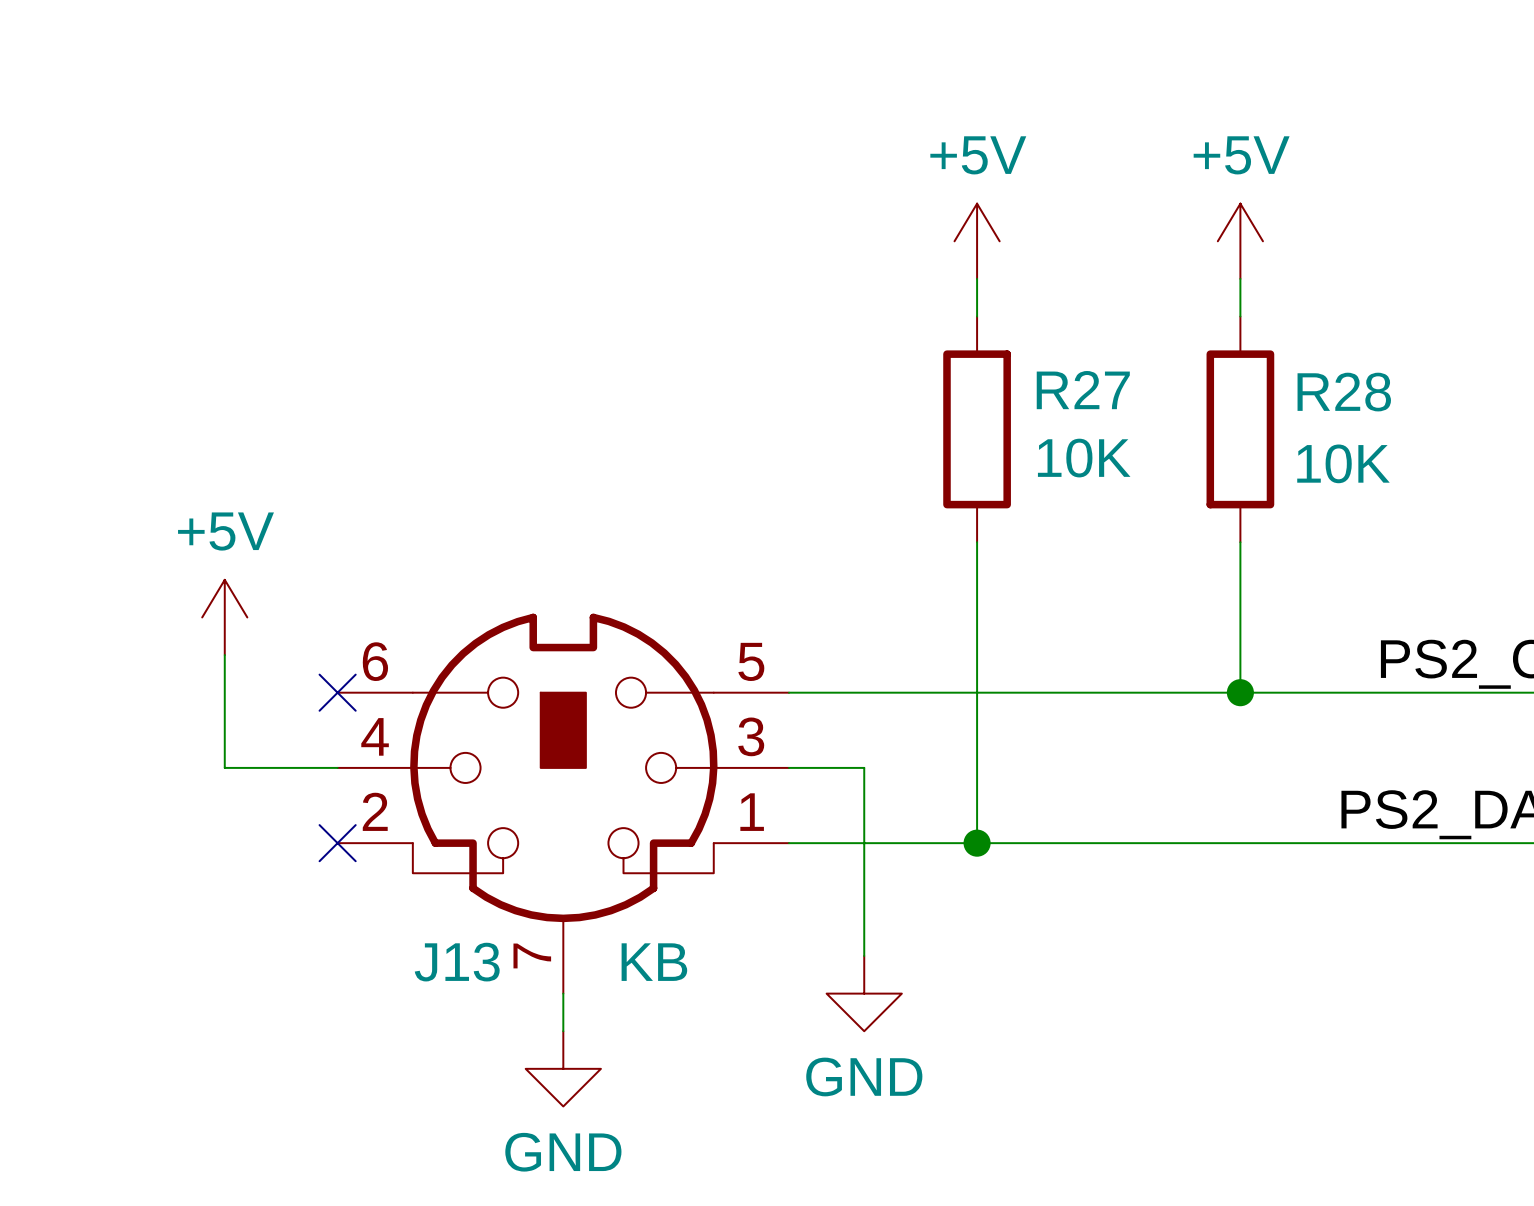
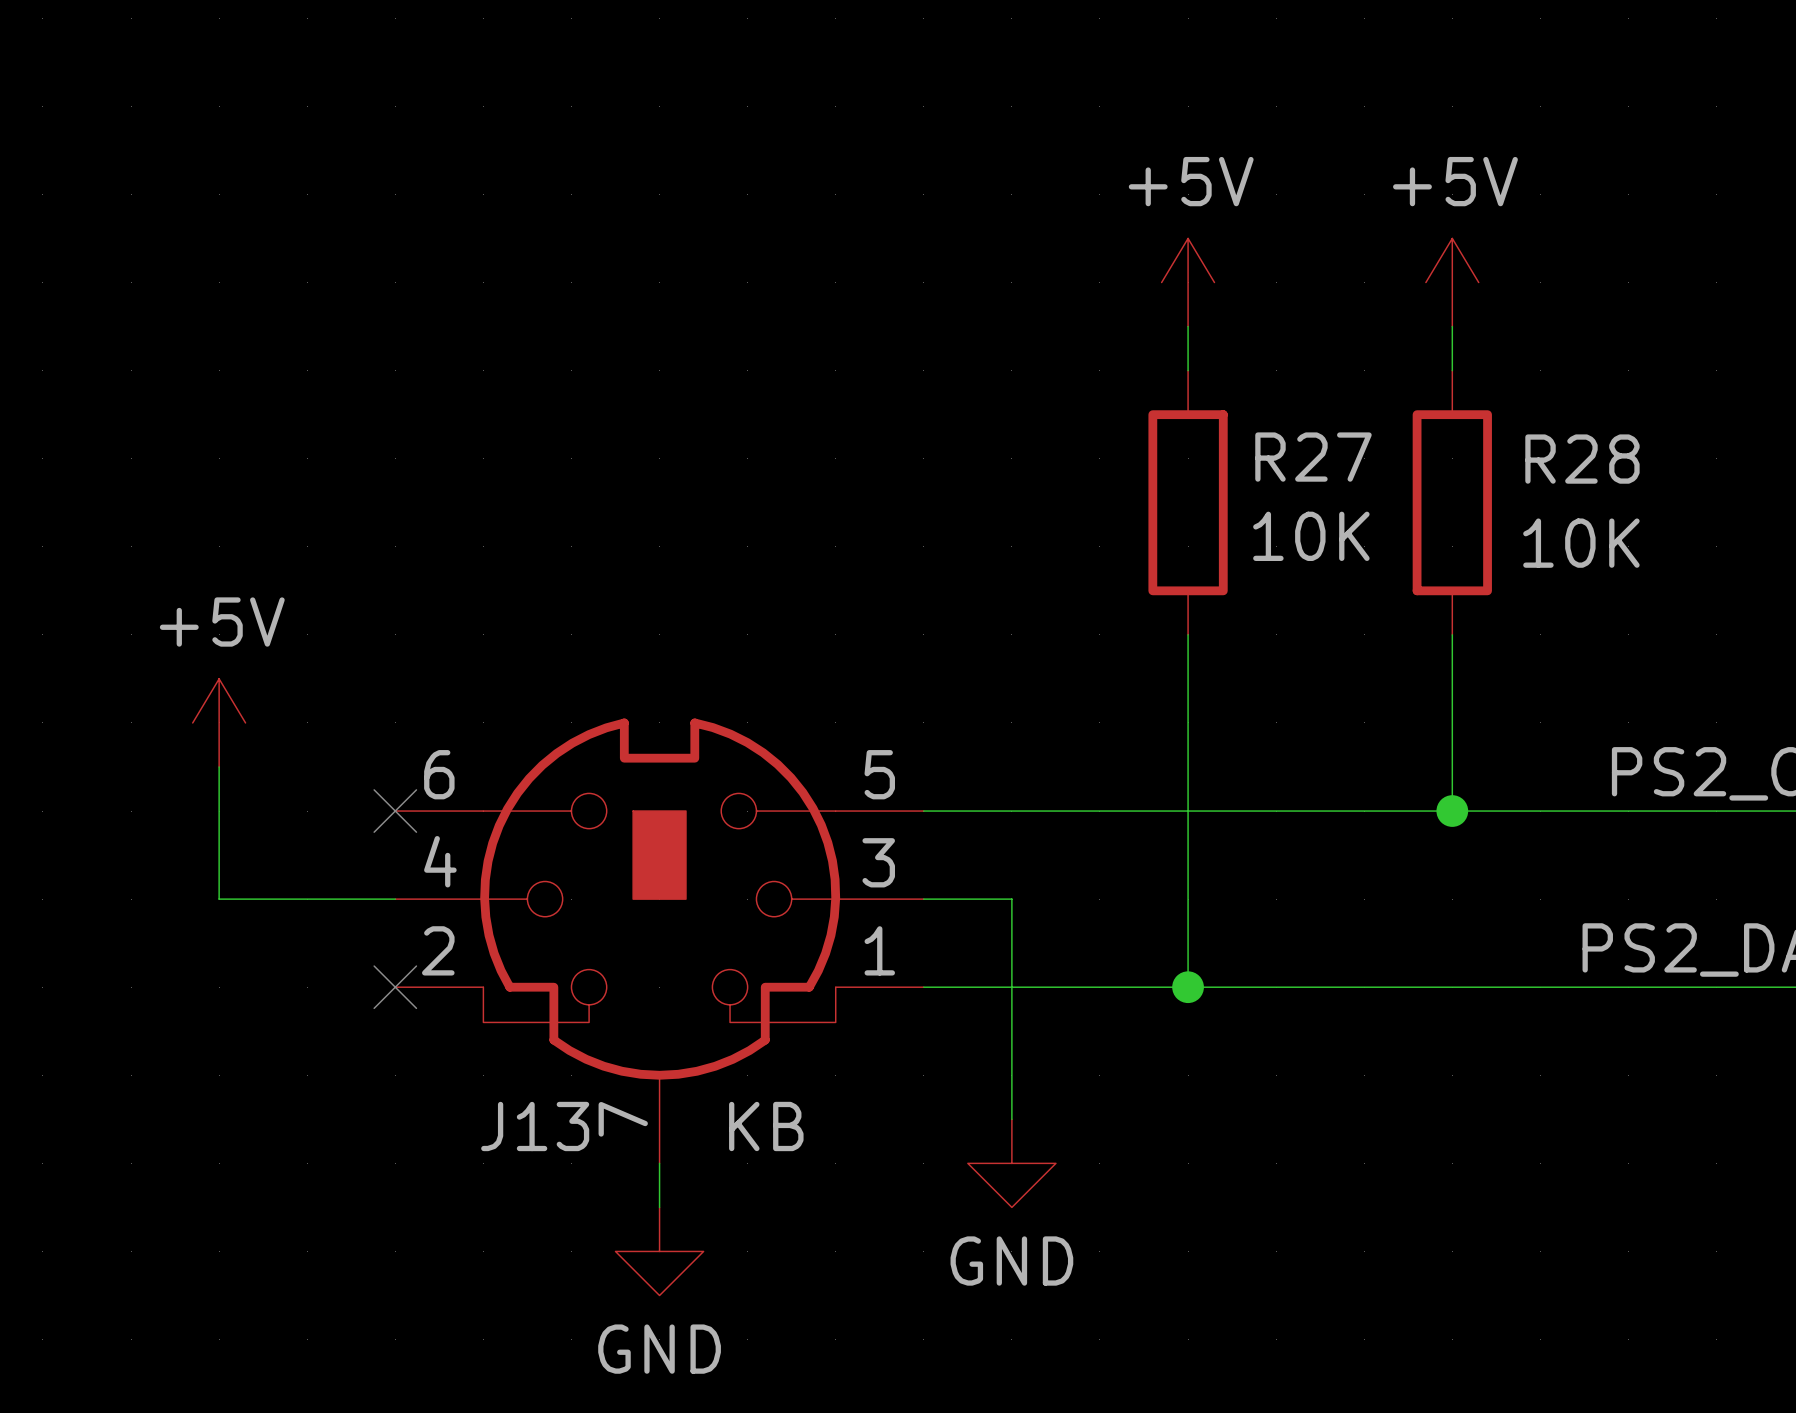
power symbol position: +5V (977, 241) -> +5V (1188, 282)
wire: (977, 278) (977, 316) -> (1188, 326) (1188, 370)
R27 position: (977, 429) -> (1188, 502)
wire: (977, 542) (977, 843) -> (1188, 634) (1188, 987)
power symbol position: +5V (224, 617) -> +5V (219, 722)
wire: (224, 655) (224, 767) -> (219, 766) (219, 899) (263, 899)
junction position: (977, 843) -> (1188, 987)

